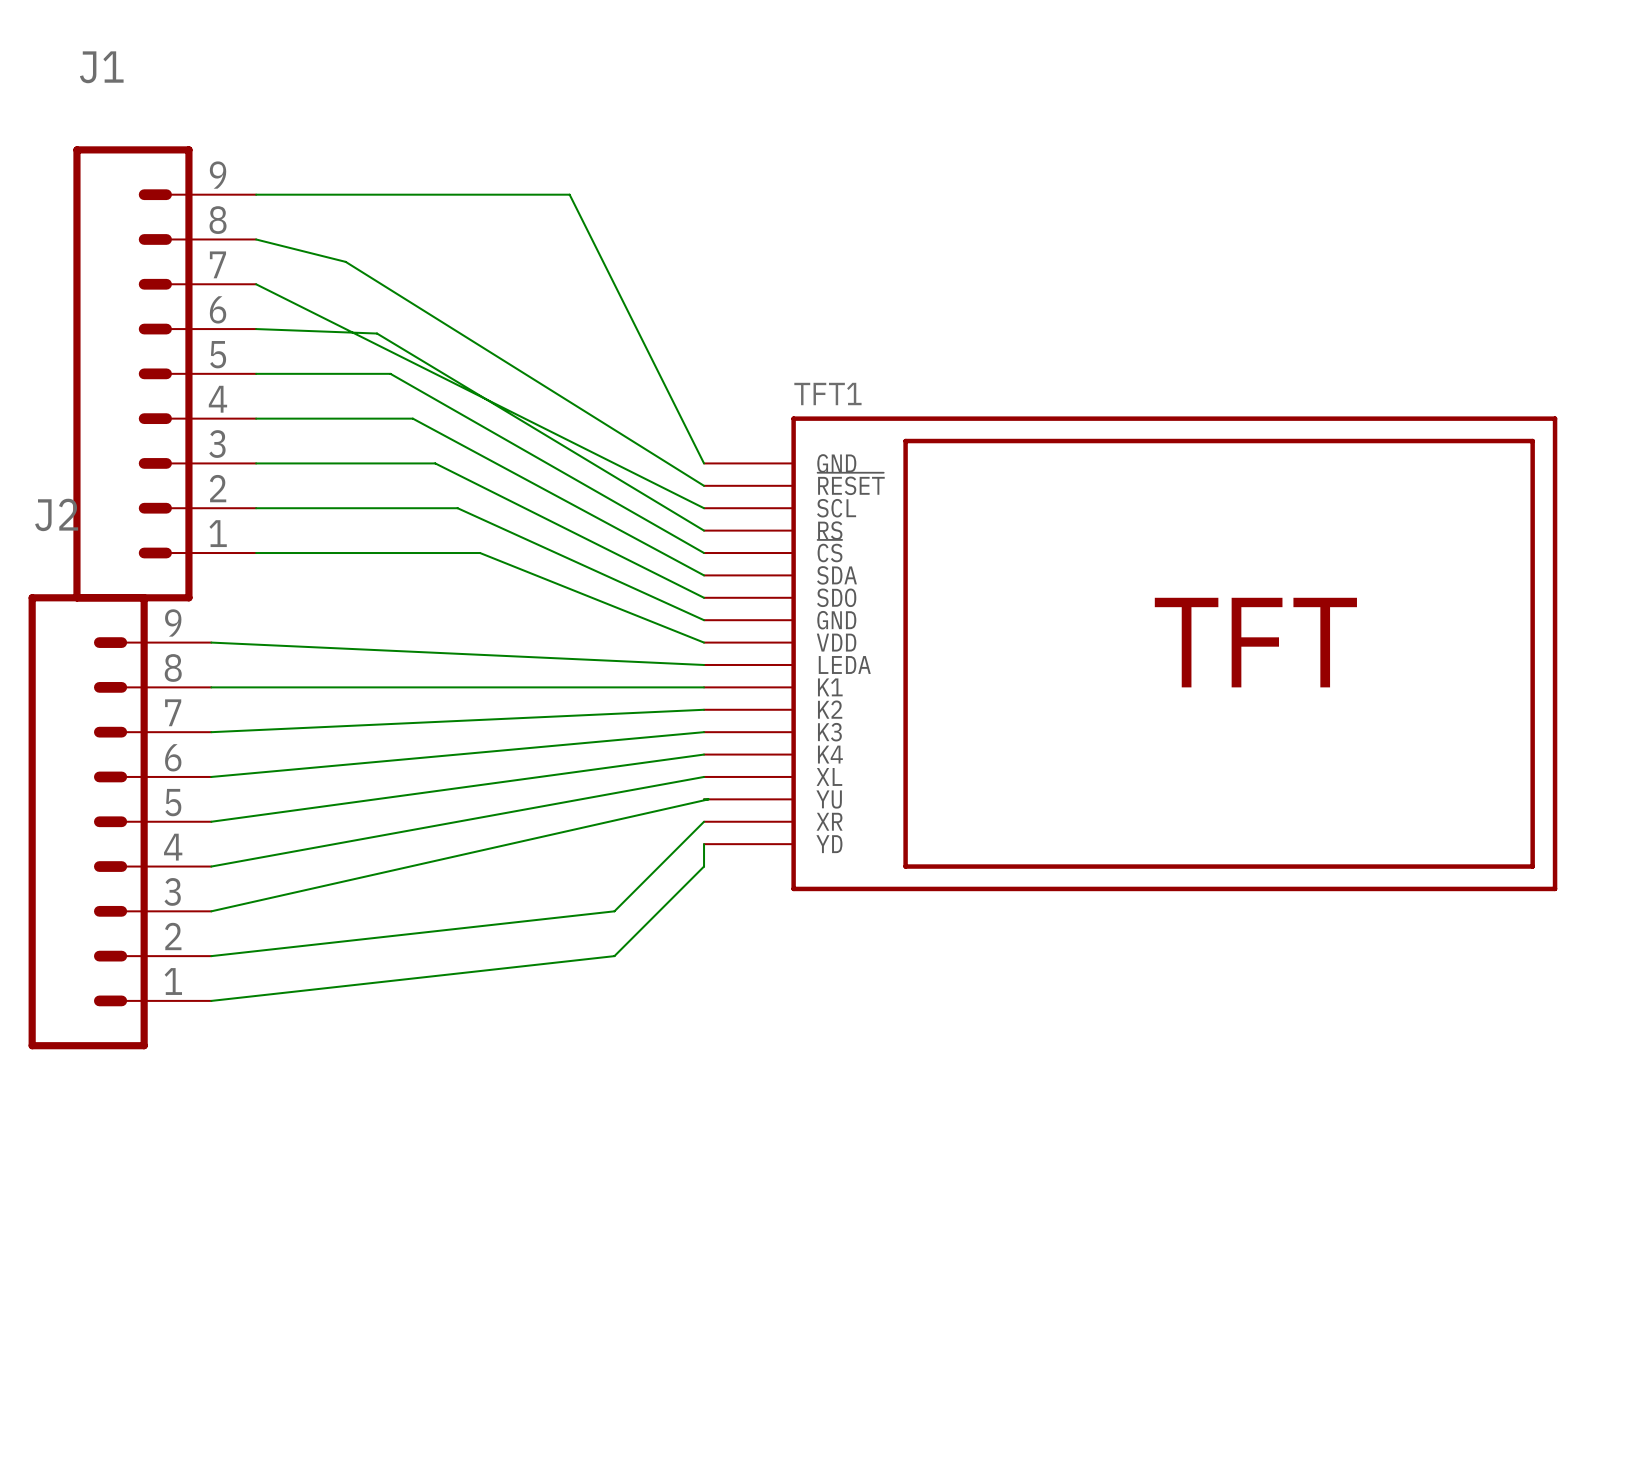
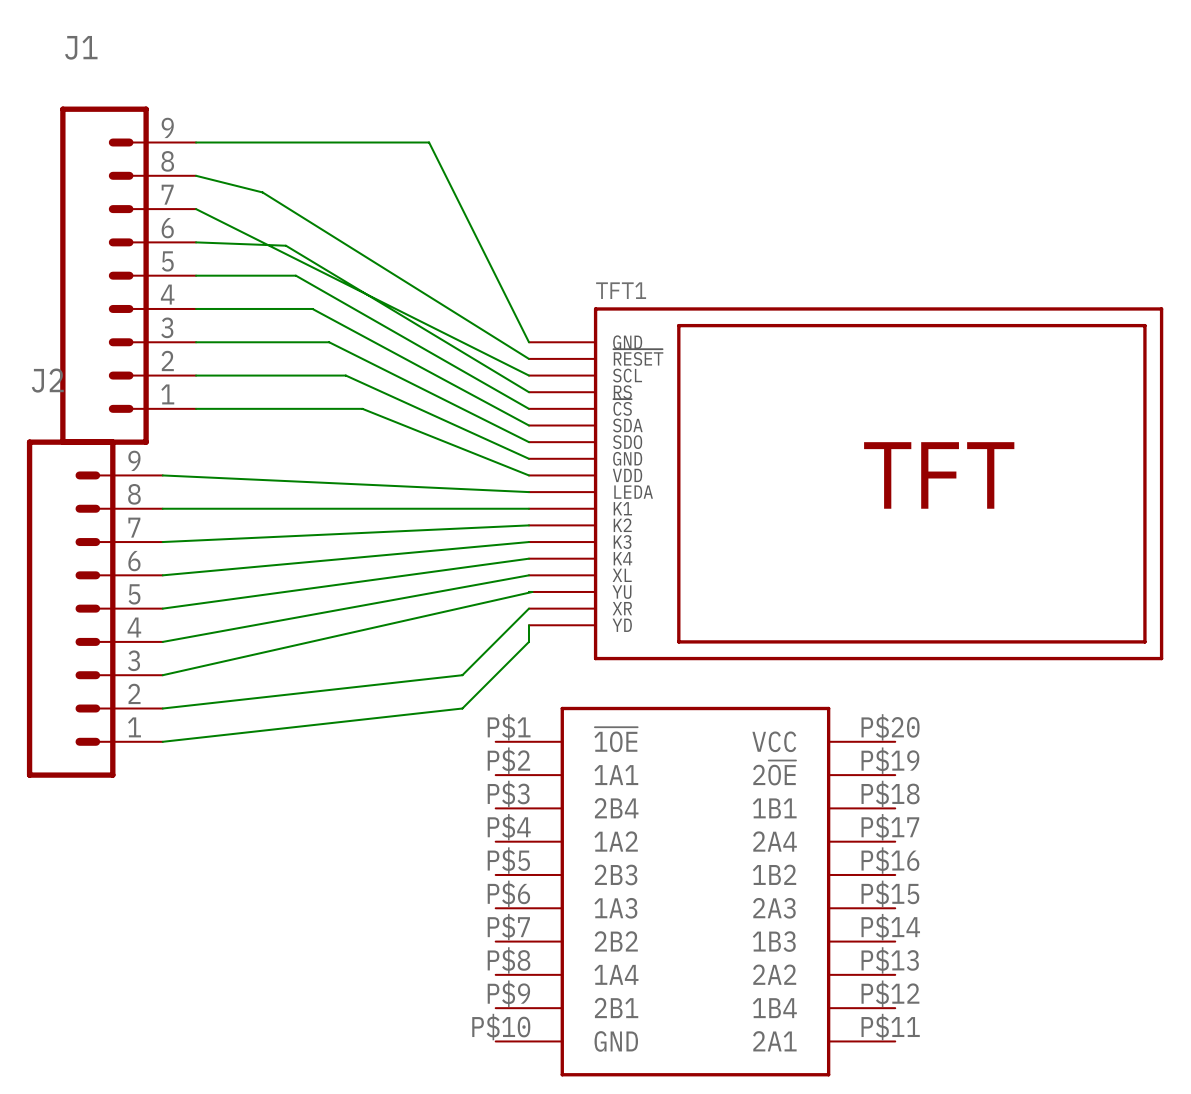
part: none -> (695, 891)

